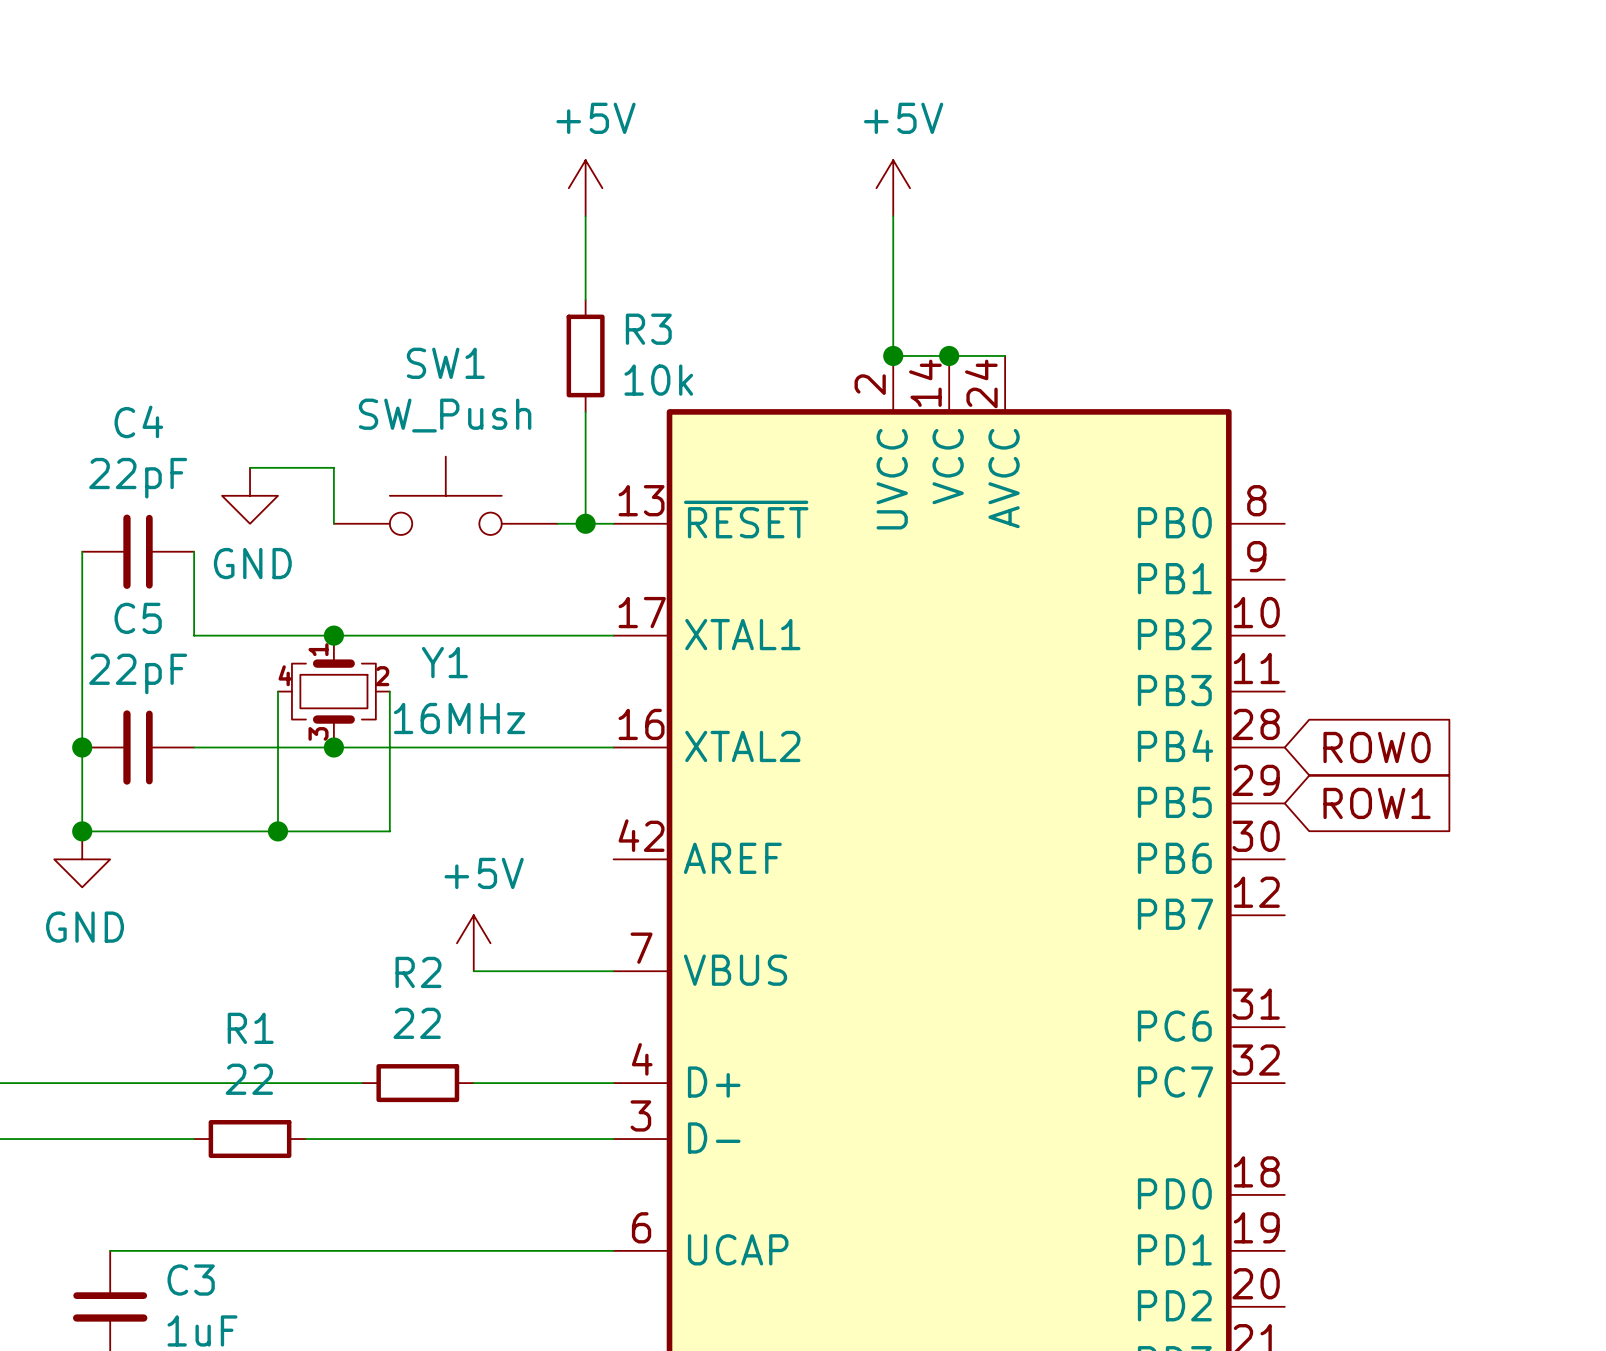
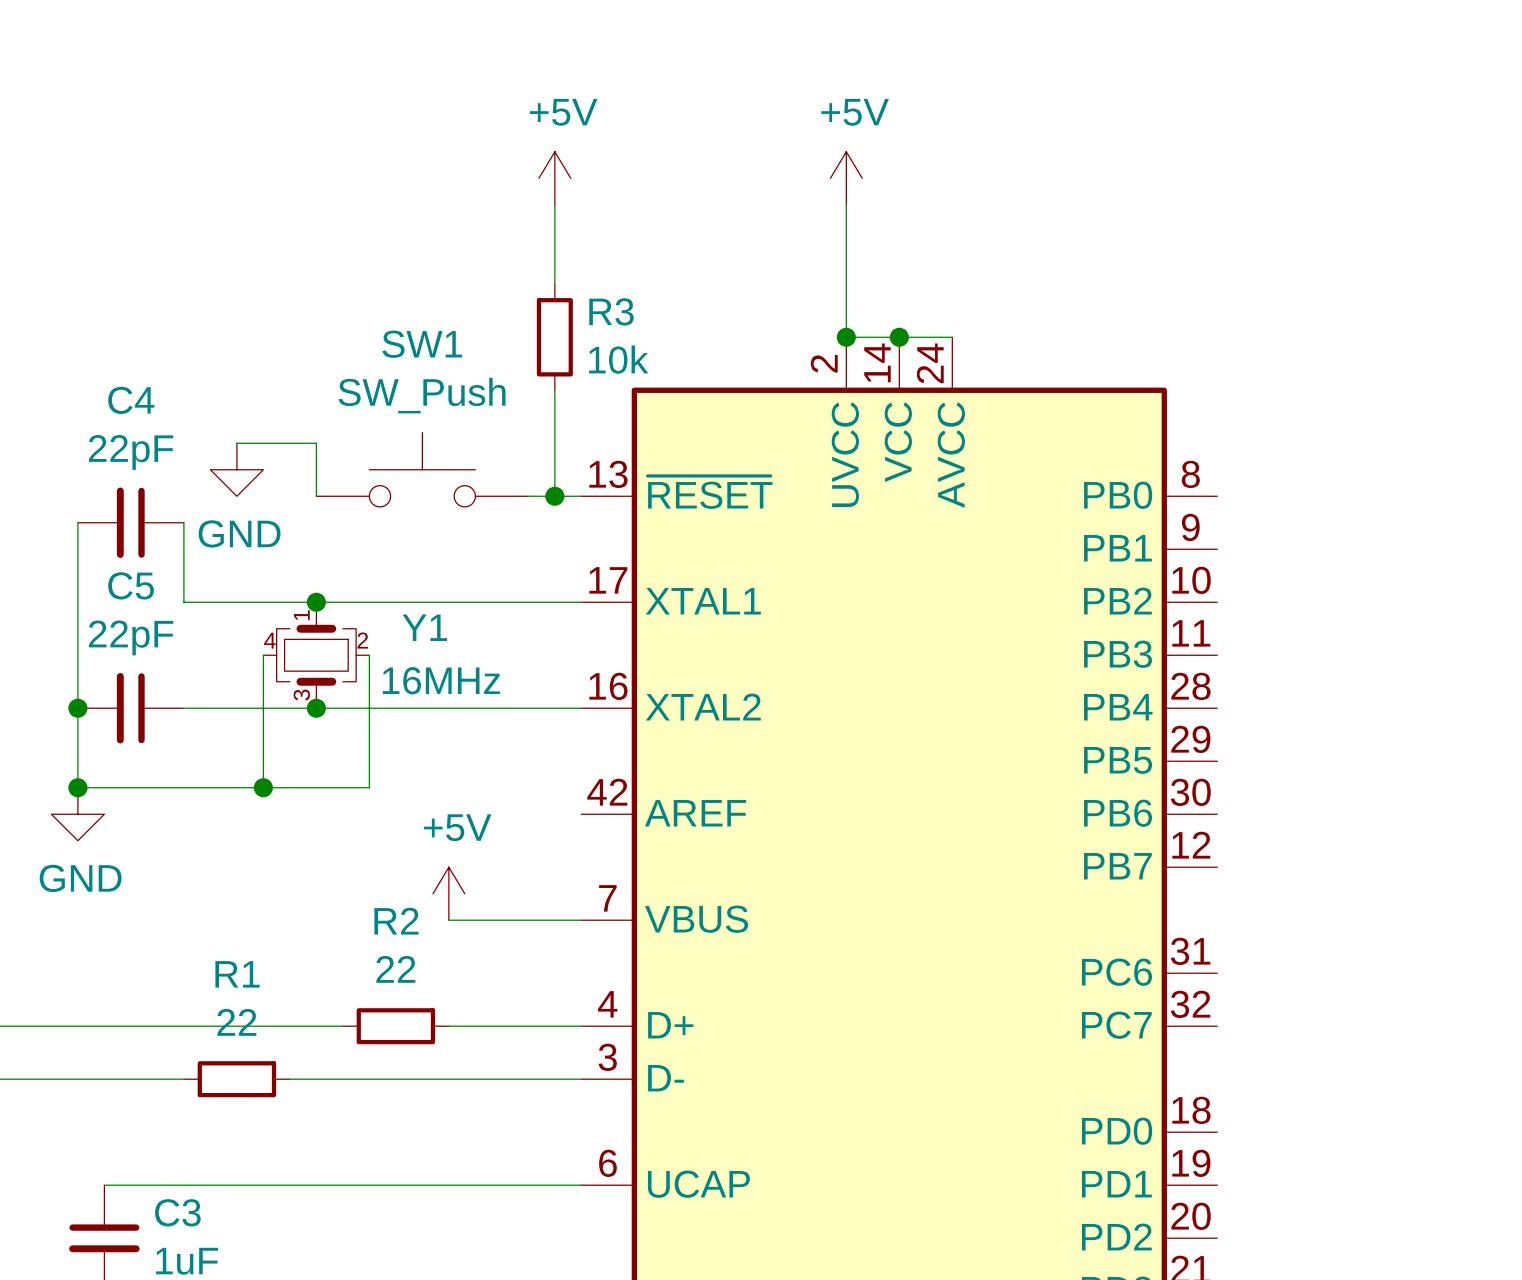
global label: ROW0 (1377, 747) -> none
global label: ROW1 (1377, 803) -> none

